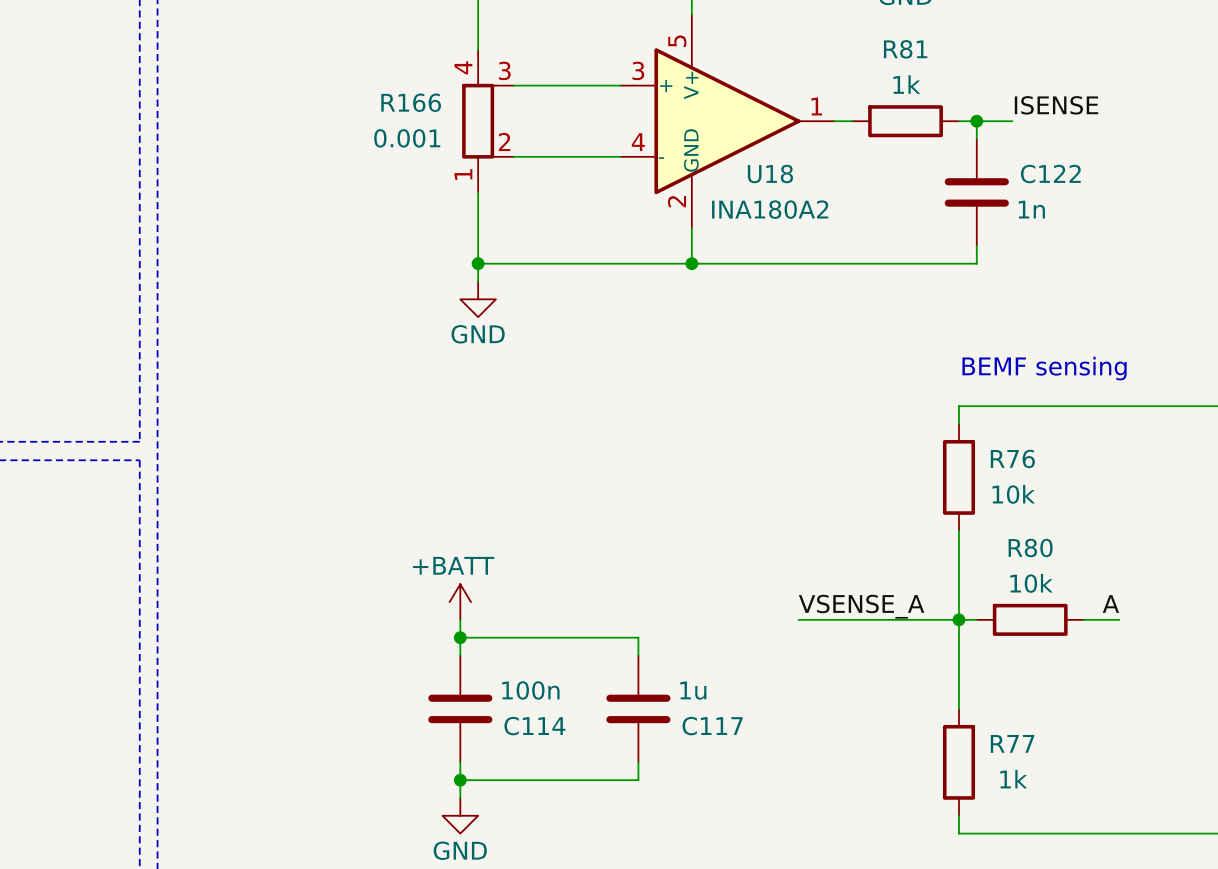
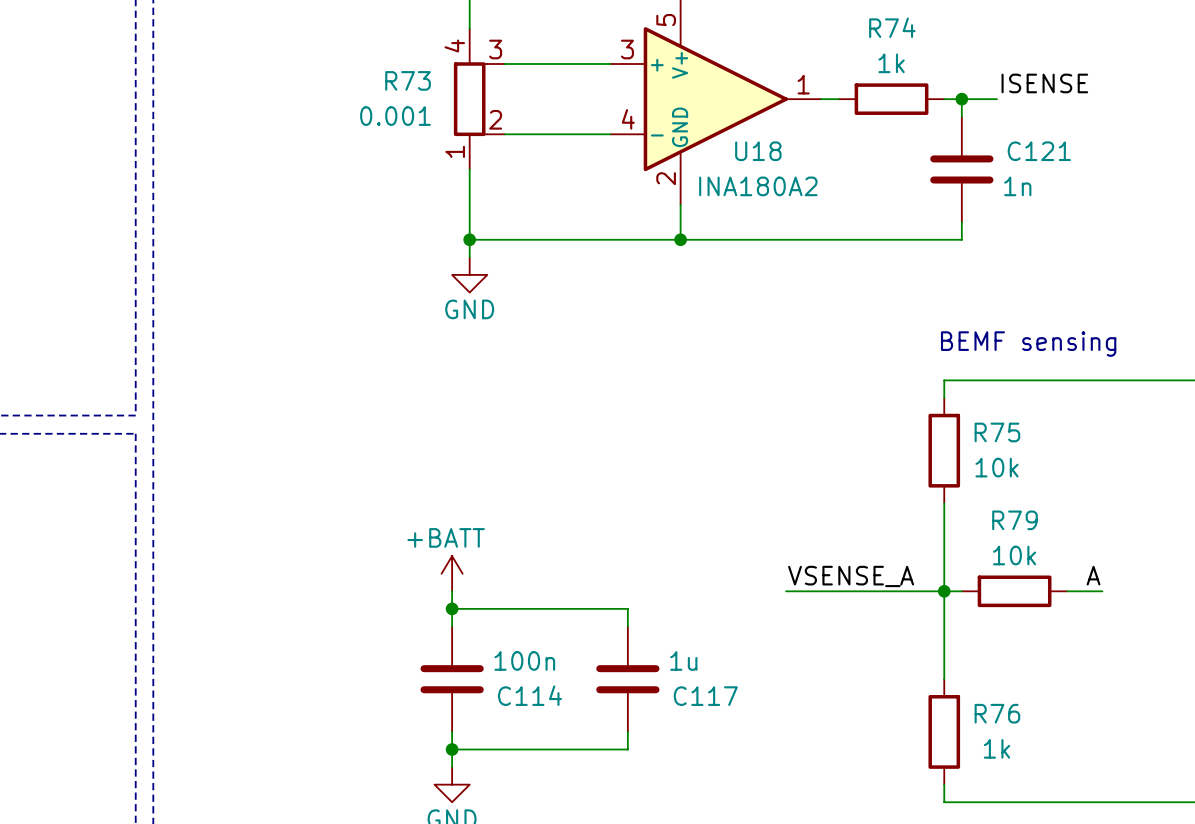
R81 name: R81 (905, 49) -> R74 (892, 27)
R166 name: R166 (411, 102) -> R73 (408, 80)
C122 name: C122 (1050, 173) -> C121 (1039, 151)
R76 name: R76 (1012, 458) -> R75 (997, 432)
R80 name: R80 (1030, 547) -> R79 (1014, 520)
R77 name: R77 (1012, 743) -> R76 (997, 713)

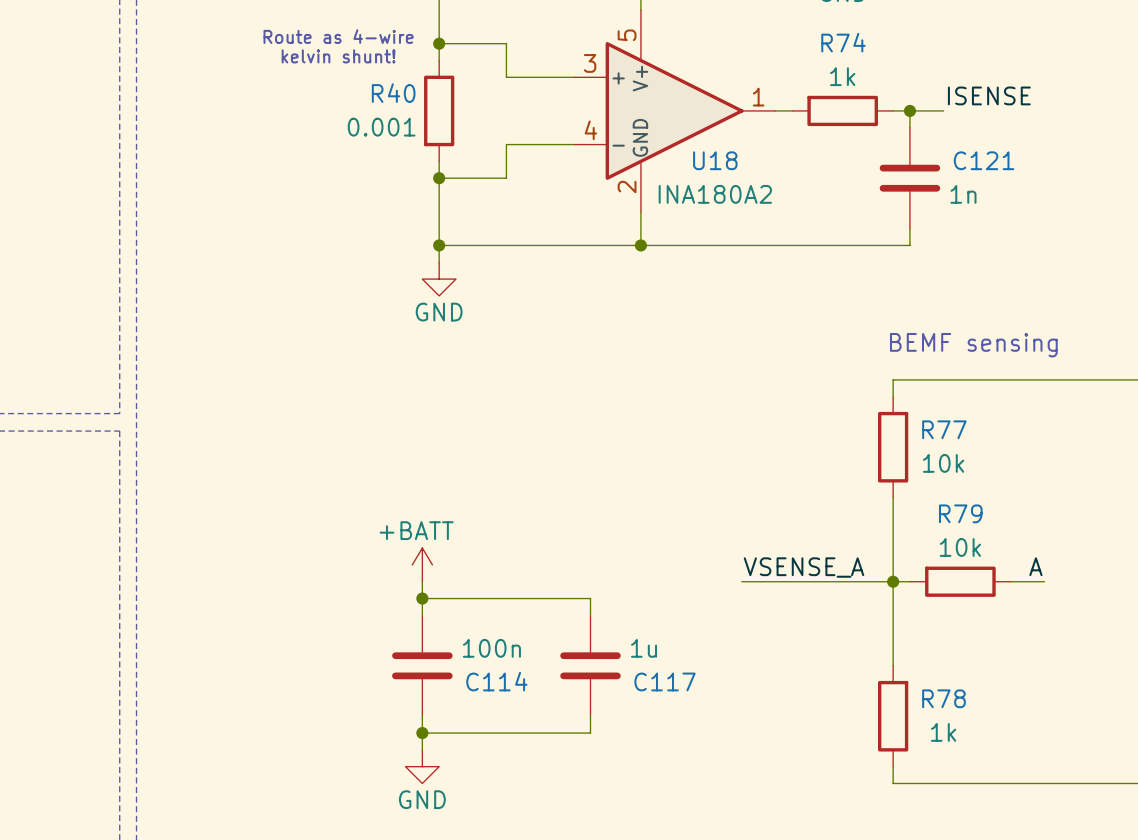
text: none -> Route as 4-wire (338, 36)
junction: none -> (439, 43)
text: none -> kelvin shunt! (338, 56)
wire: (504, 64) (539, 64) -> (439, 60) (439, 43) (506, 43) (506, 77)
R40: none -> 0.001 (439, 110)
R73: 0.001 (479, 99) -> none
wire: (504, 134) (539, 134) -> (439, 161) (439, 178) (506, 178) (506, 144)
junction: none -> (439, 178)
R75 name: R75 (997, 432) -> R77 (944, 429)
R76 name: R76 (997, 713) -> R78 (943, 698)

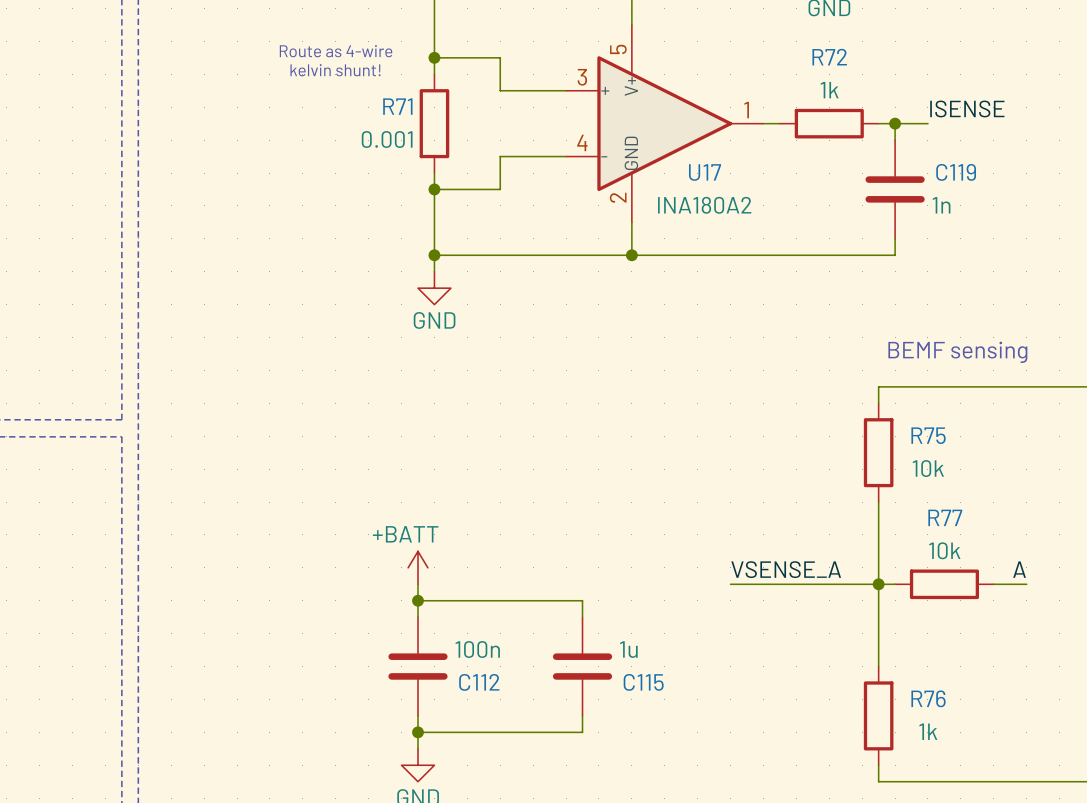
R74 name: R74 (843, 42) -> R72 (829, 57)
R40 name: R40 (393, 93) -> R71 (397, 106)
U18 name: U18 (715, 160) -> U17 (705, 172)
C121 name: C121 (984, 160) -> C119 (956, 172)
R77 name: R77 (944, 429) -> R75 (928, 435)
R79 name: R79 (960, 513) -> R77 (945, 517)
C114 name: C114 (496, 681) -> C112 (479, 682)
C117 name: C117 (665, 681) -> C115 (643, 682)
R78 name: R78 (943, 698) -> R76 (928, 698)

